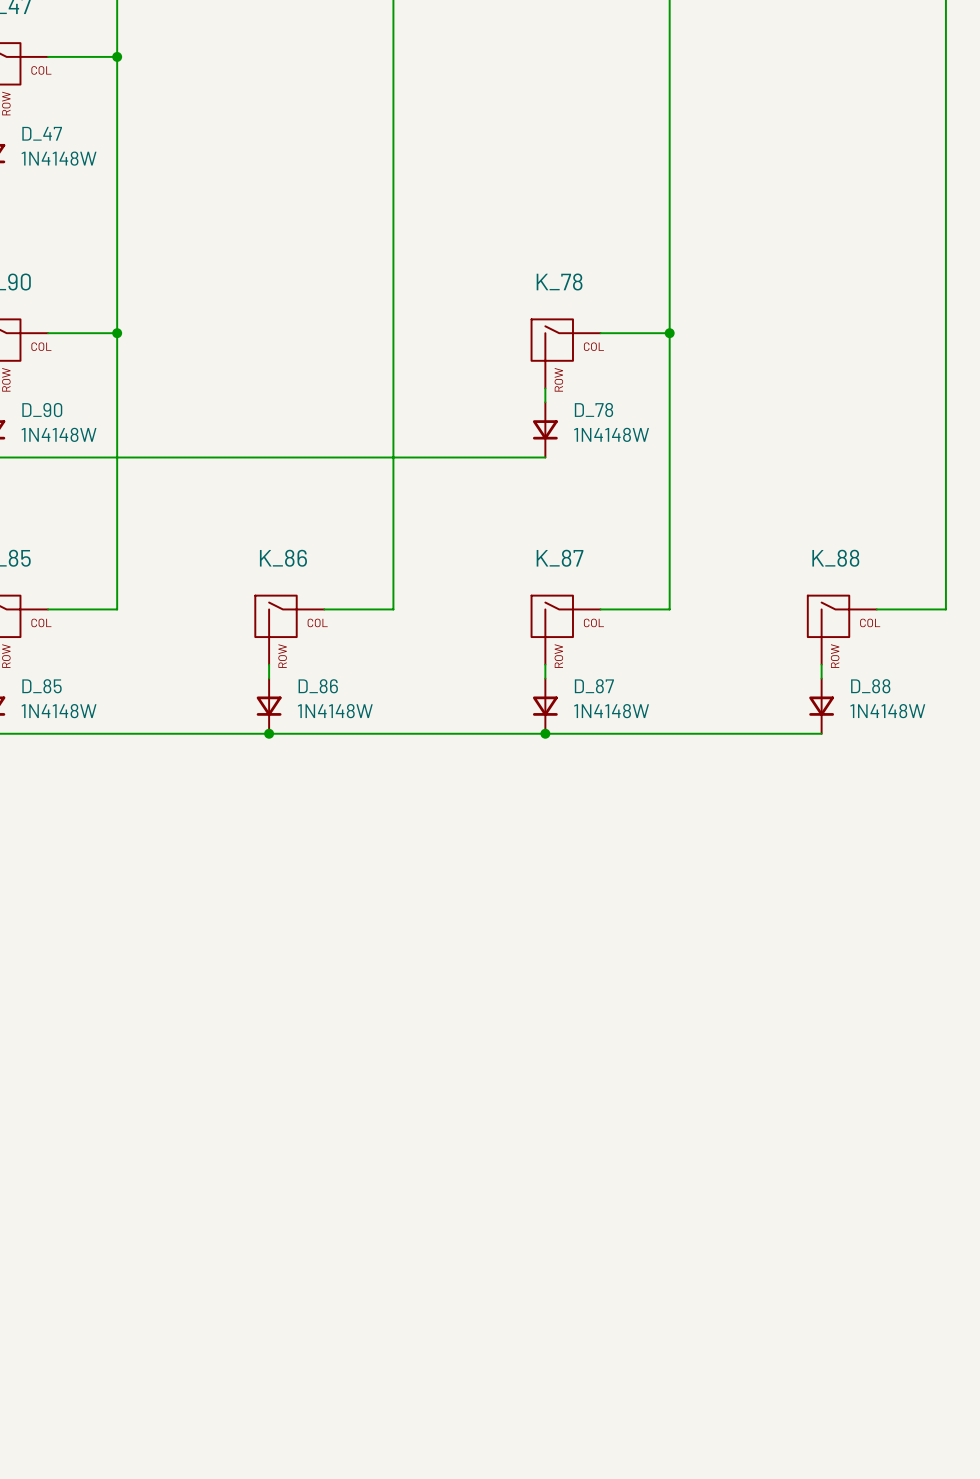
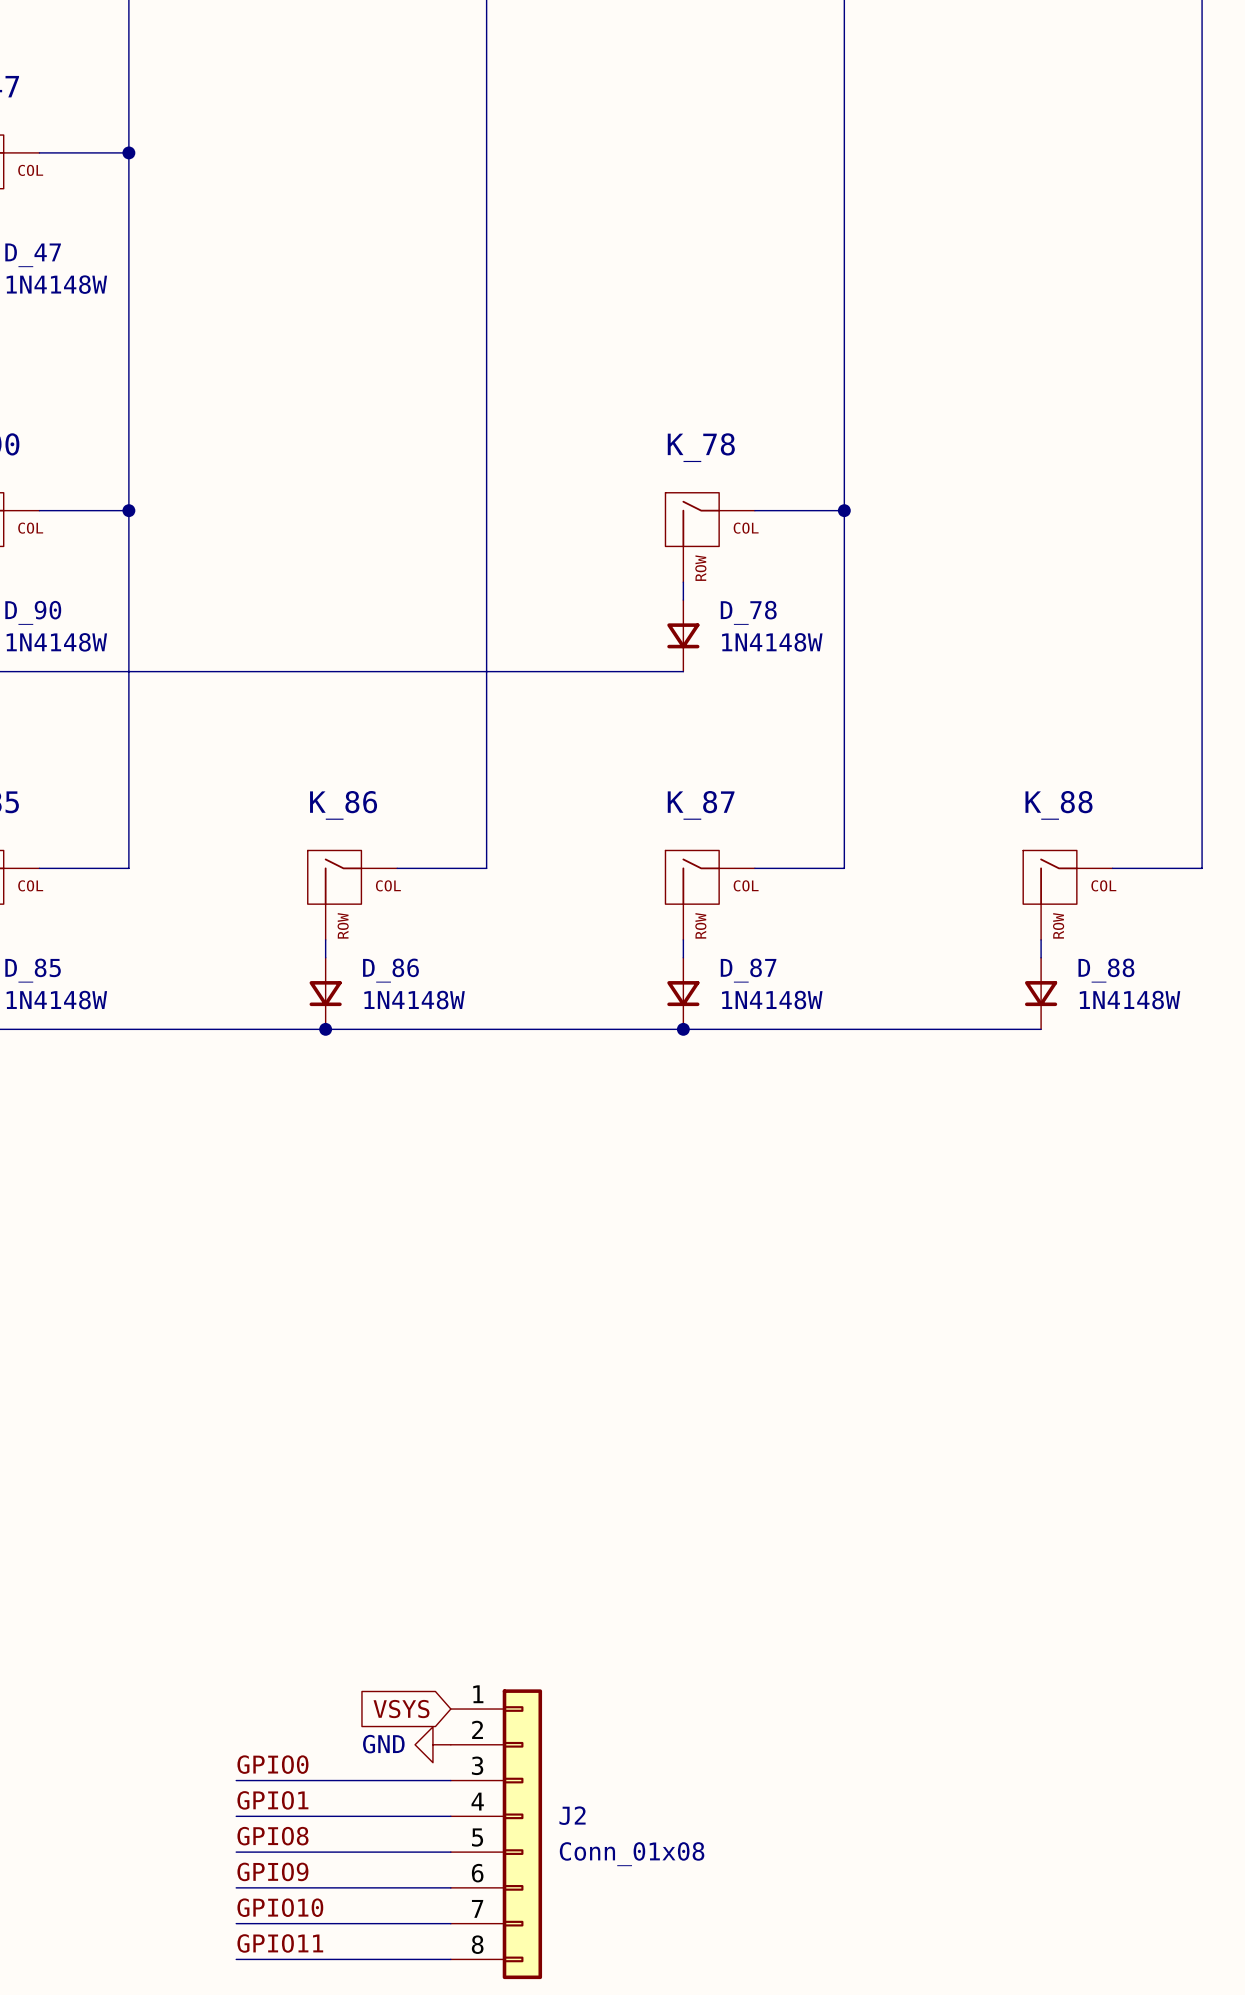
global label: none -> VSYS (401, 1709)
power symbol: none -> GND (432, 1744)
label: none -> GPIO0 (272, 1764)
wire: none -> (236, 1780) (450, 1780)
label: none -> GPIO1 (272, 1800)
wire: none -> (236, 1816) (450, 1816)
J2: none -> Conn_01x08 (496, 1834)
label: none -> GPIO8 (272, 1836)
wire: none -> (236, 1852) (450, 1852)
label: none -> GPIO9 (272, 1871)
wire: none -> (236, 1887) (450, 1887)
label: none -> GPIO10 (280, 1907)
wire: none -> (236, 1923) (450, 1923)
label: none -> GPIO11 (280, 1943)
wire: none -> (236, 1959) (450, 1959)

